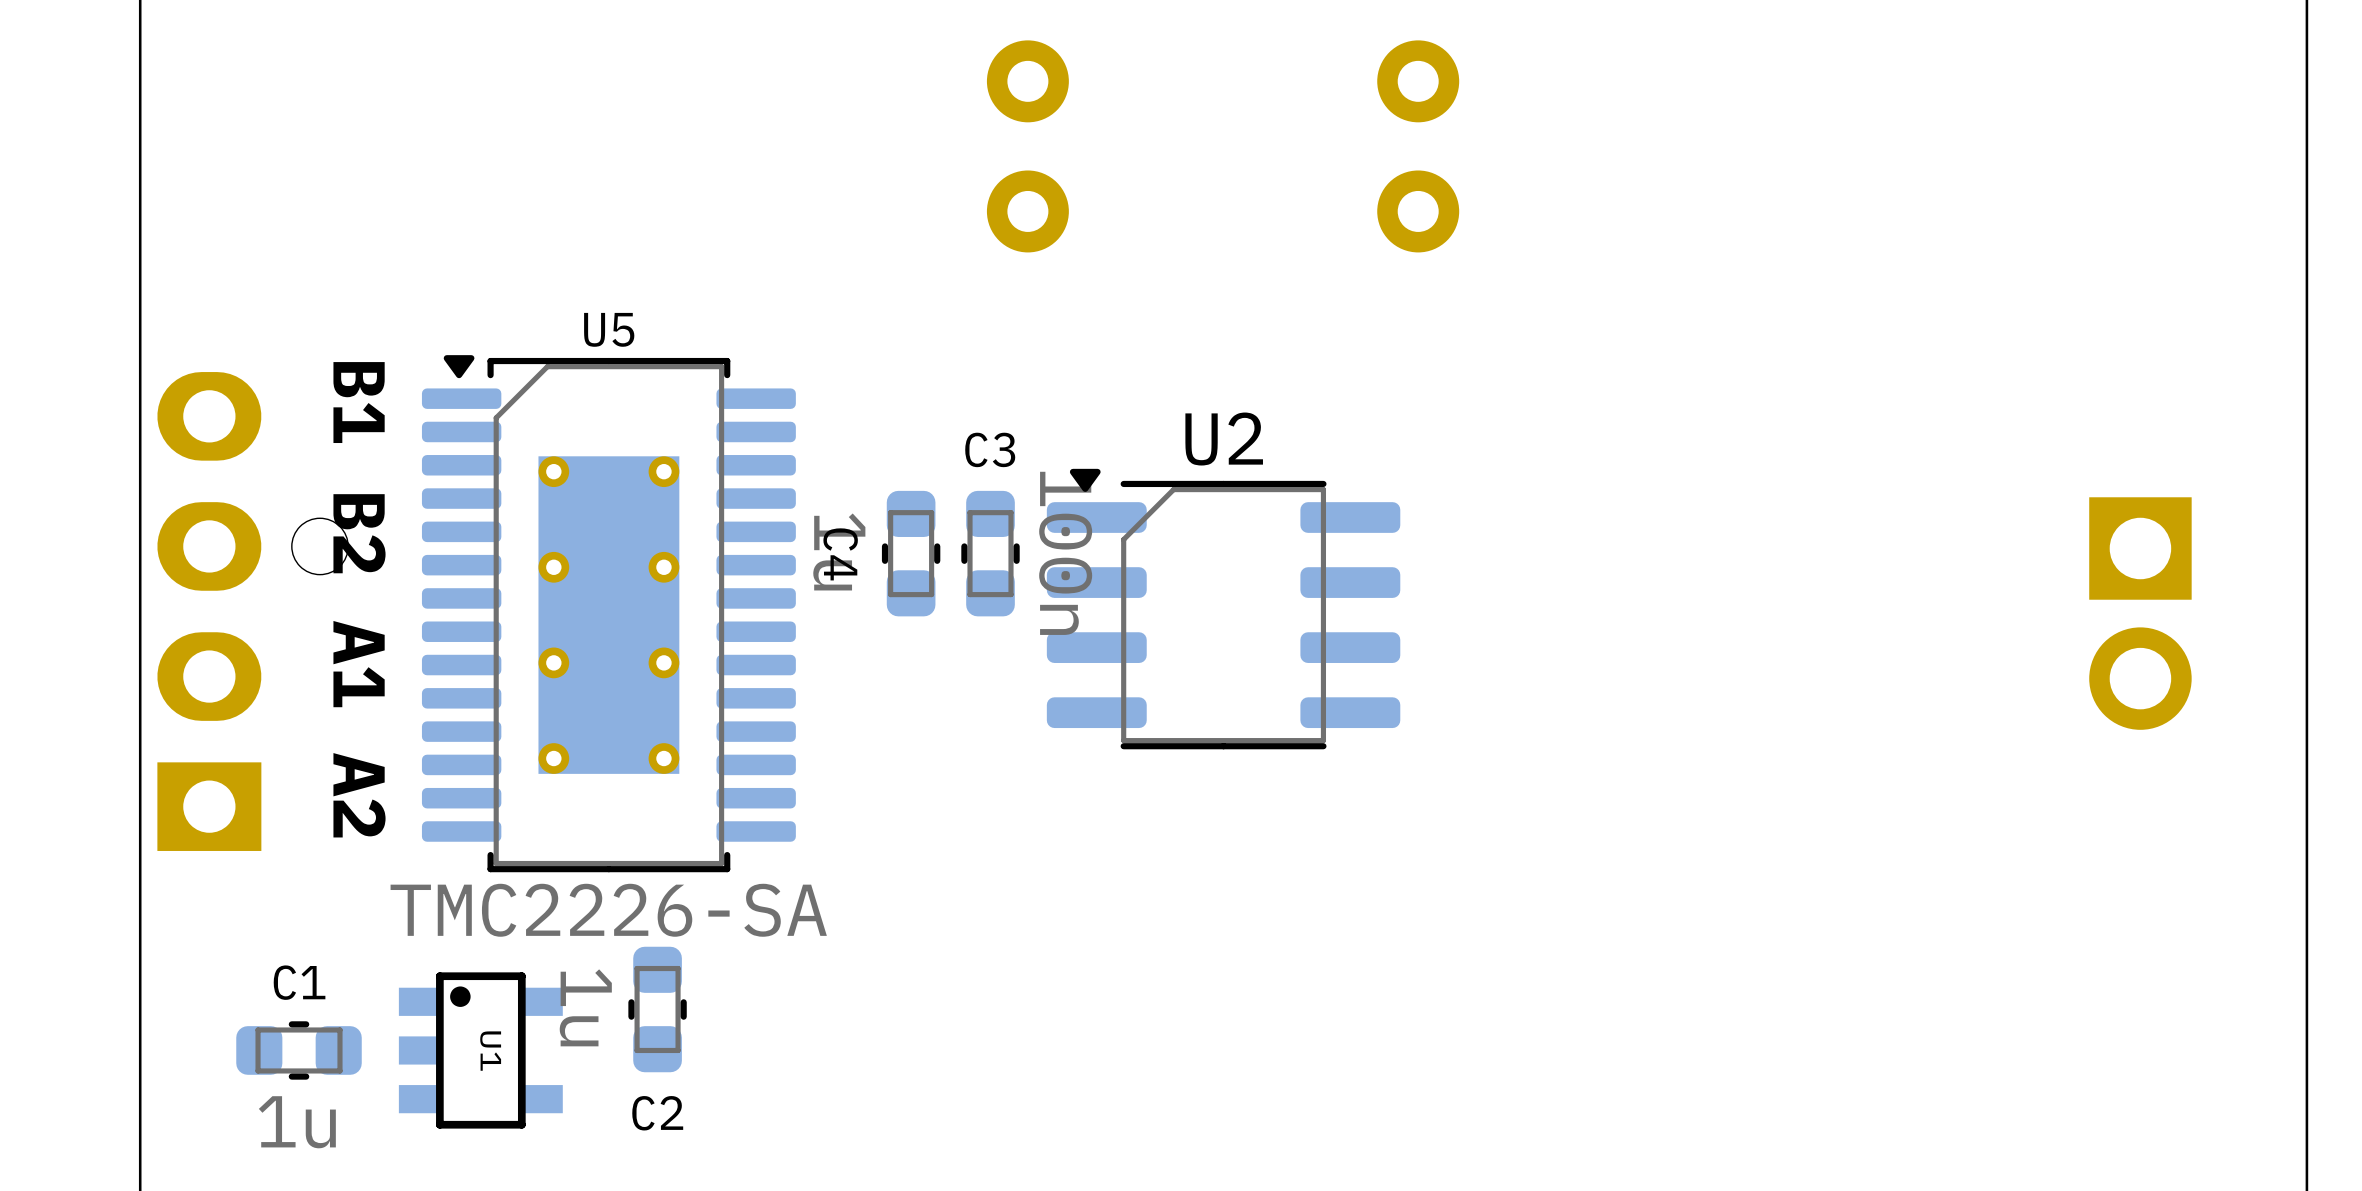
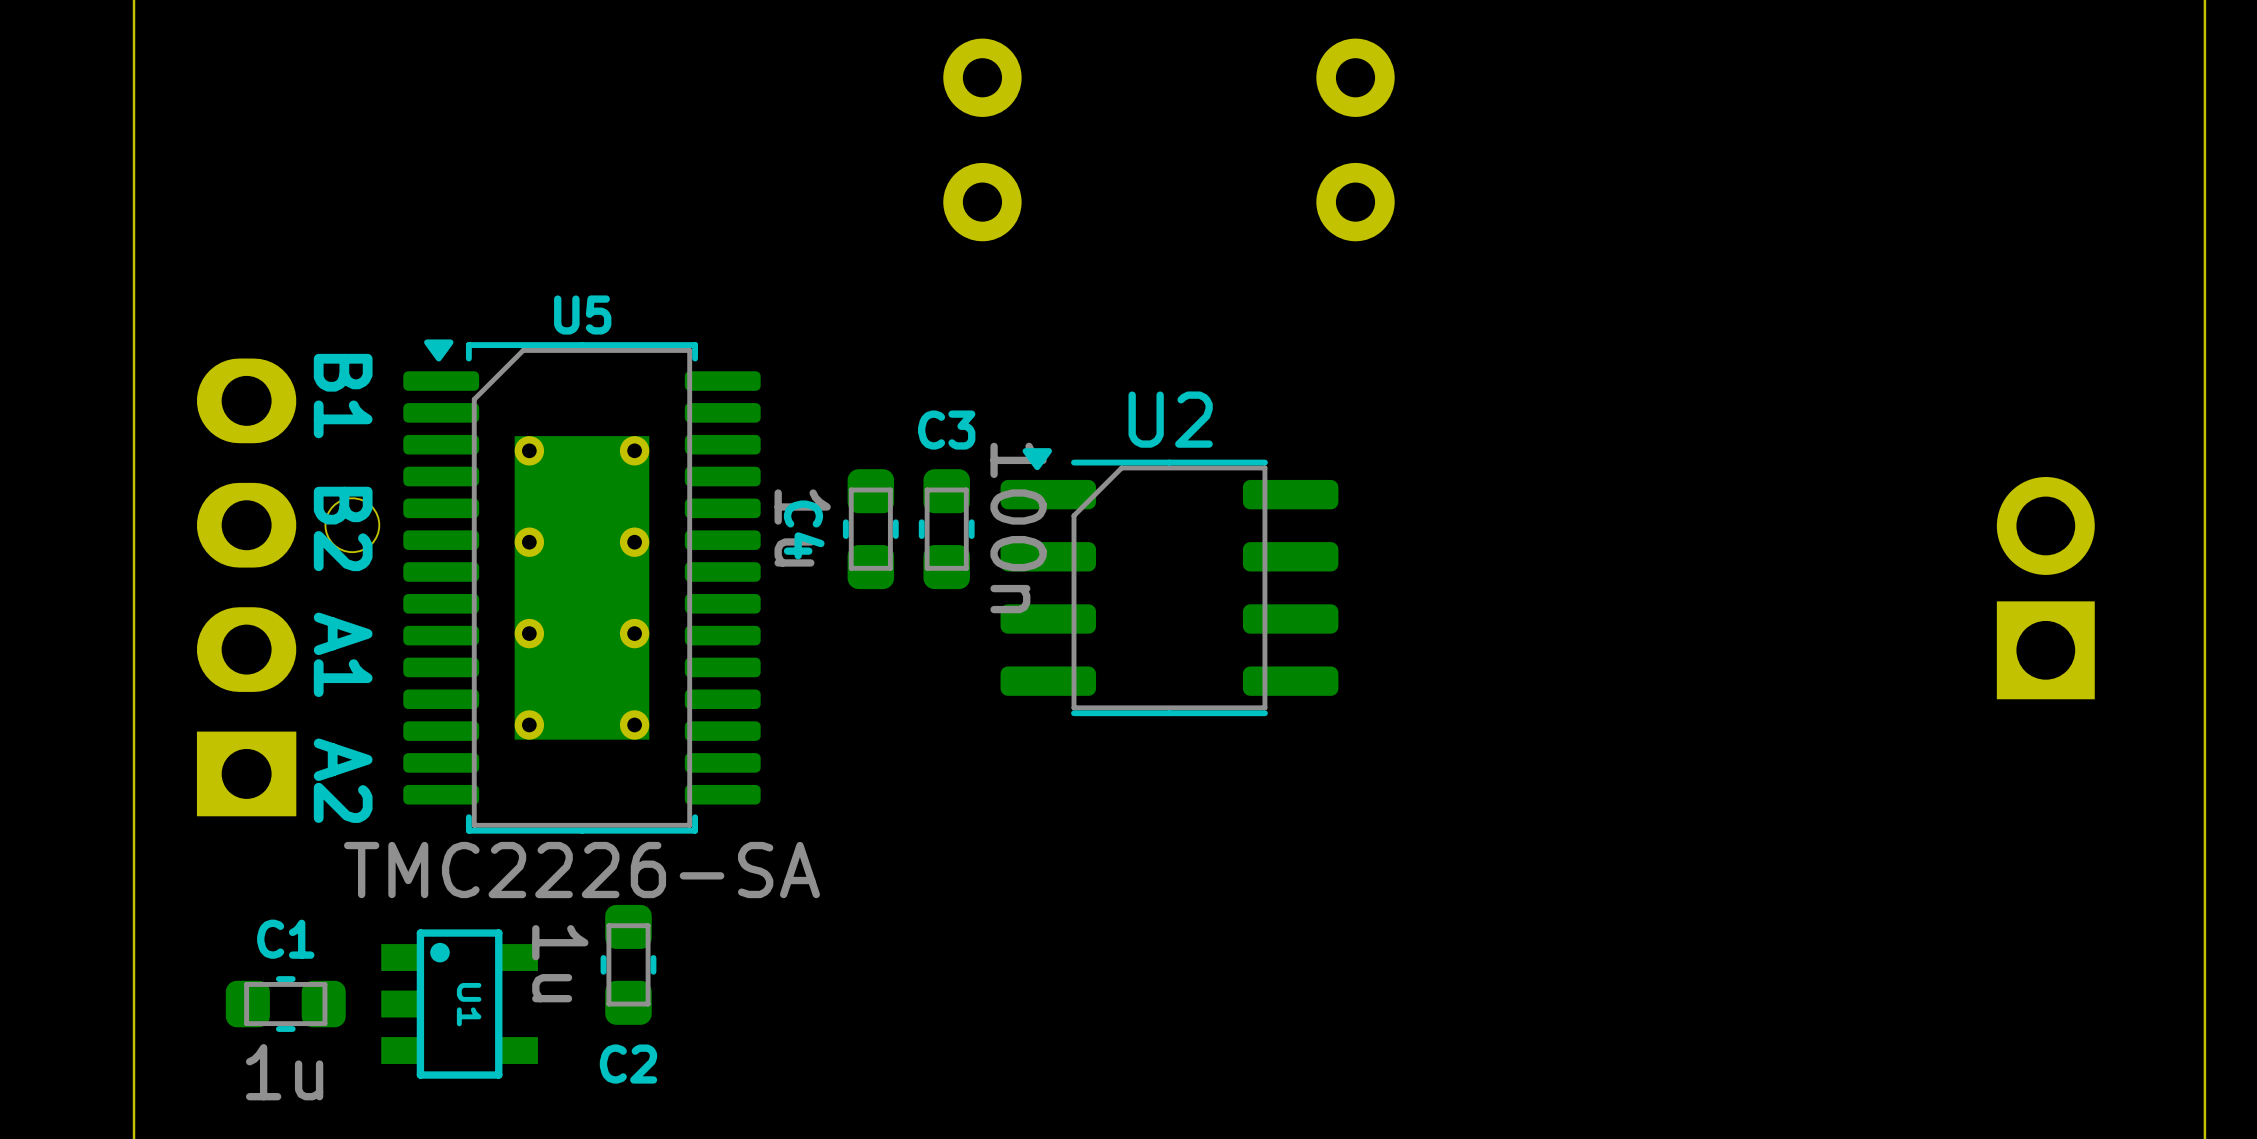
part position: (252, 611) -> (288, 587)
part rotation: 0° (2140, 613) -> 180° (2045, 588)

